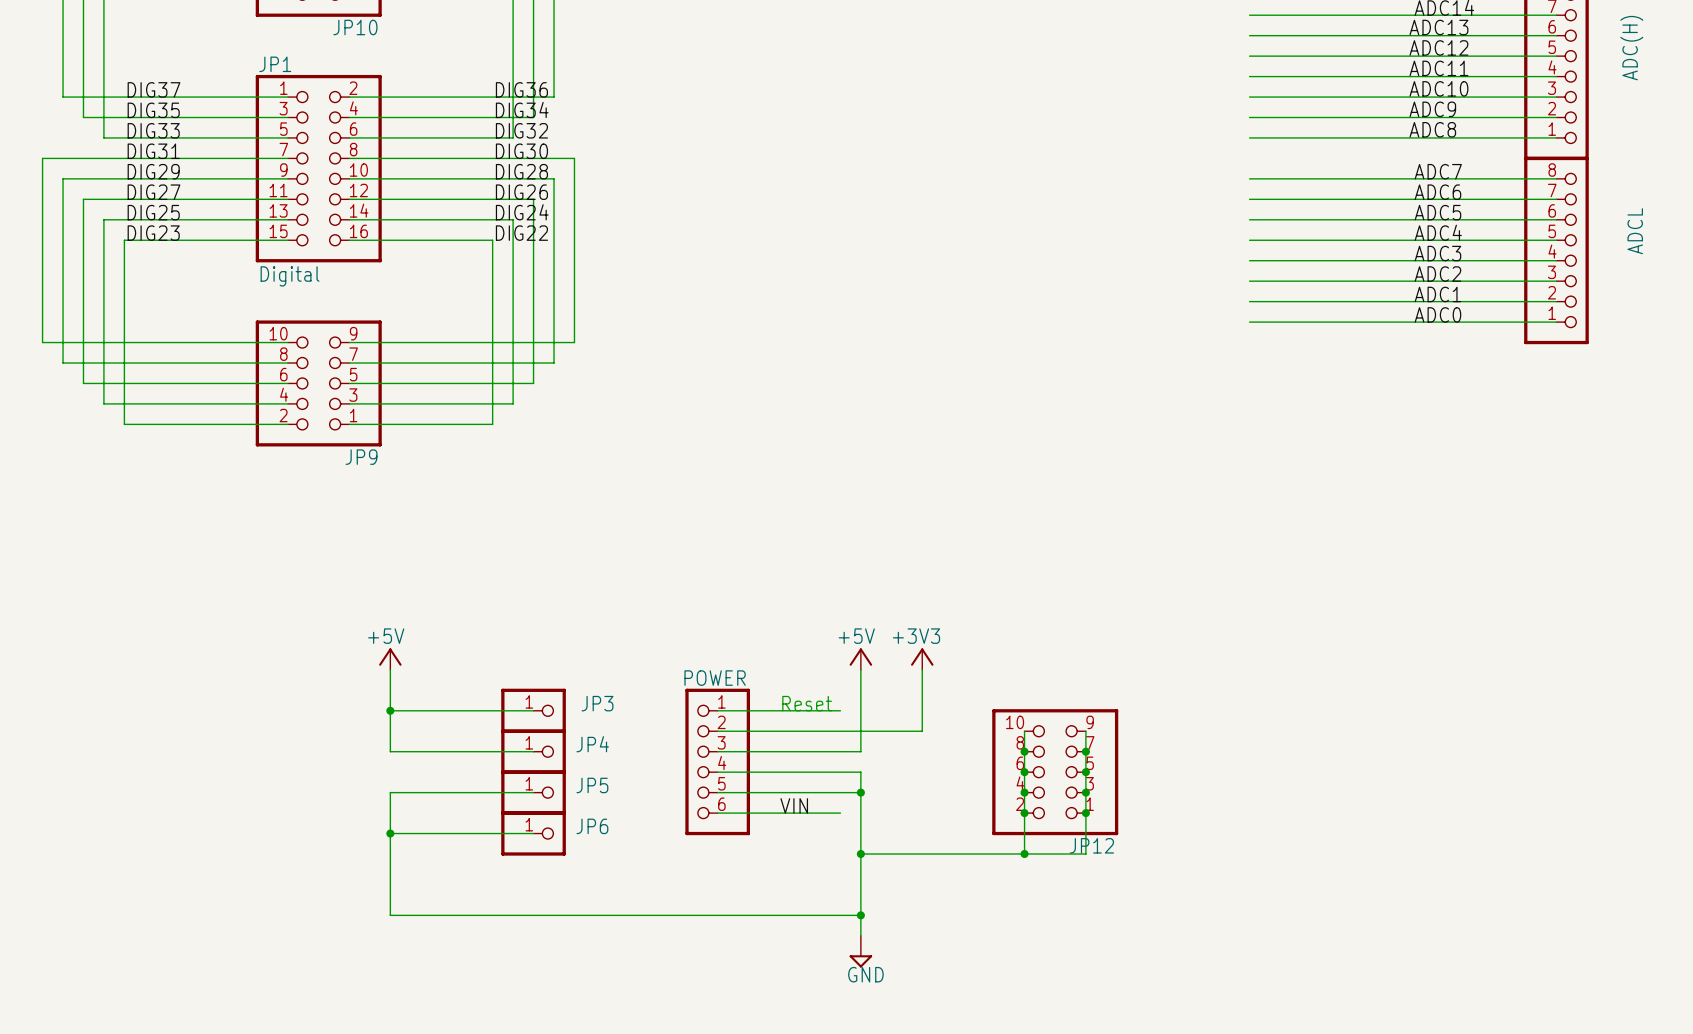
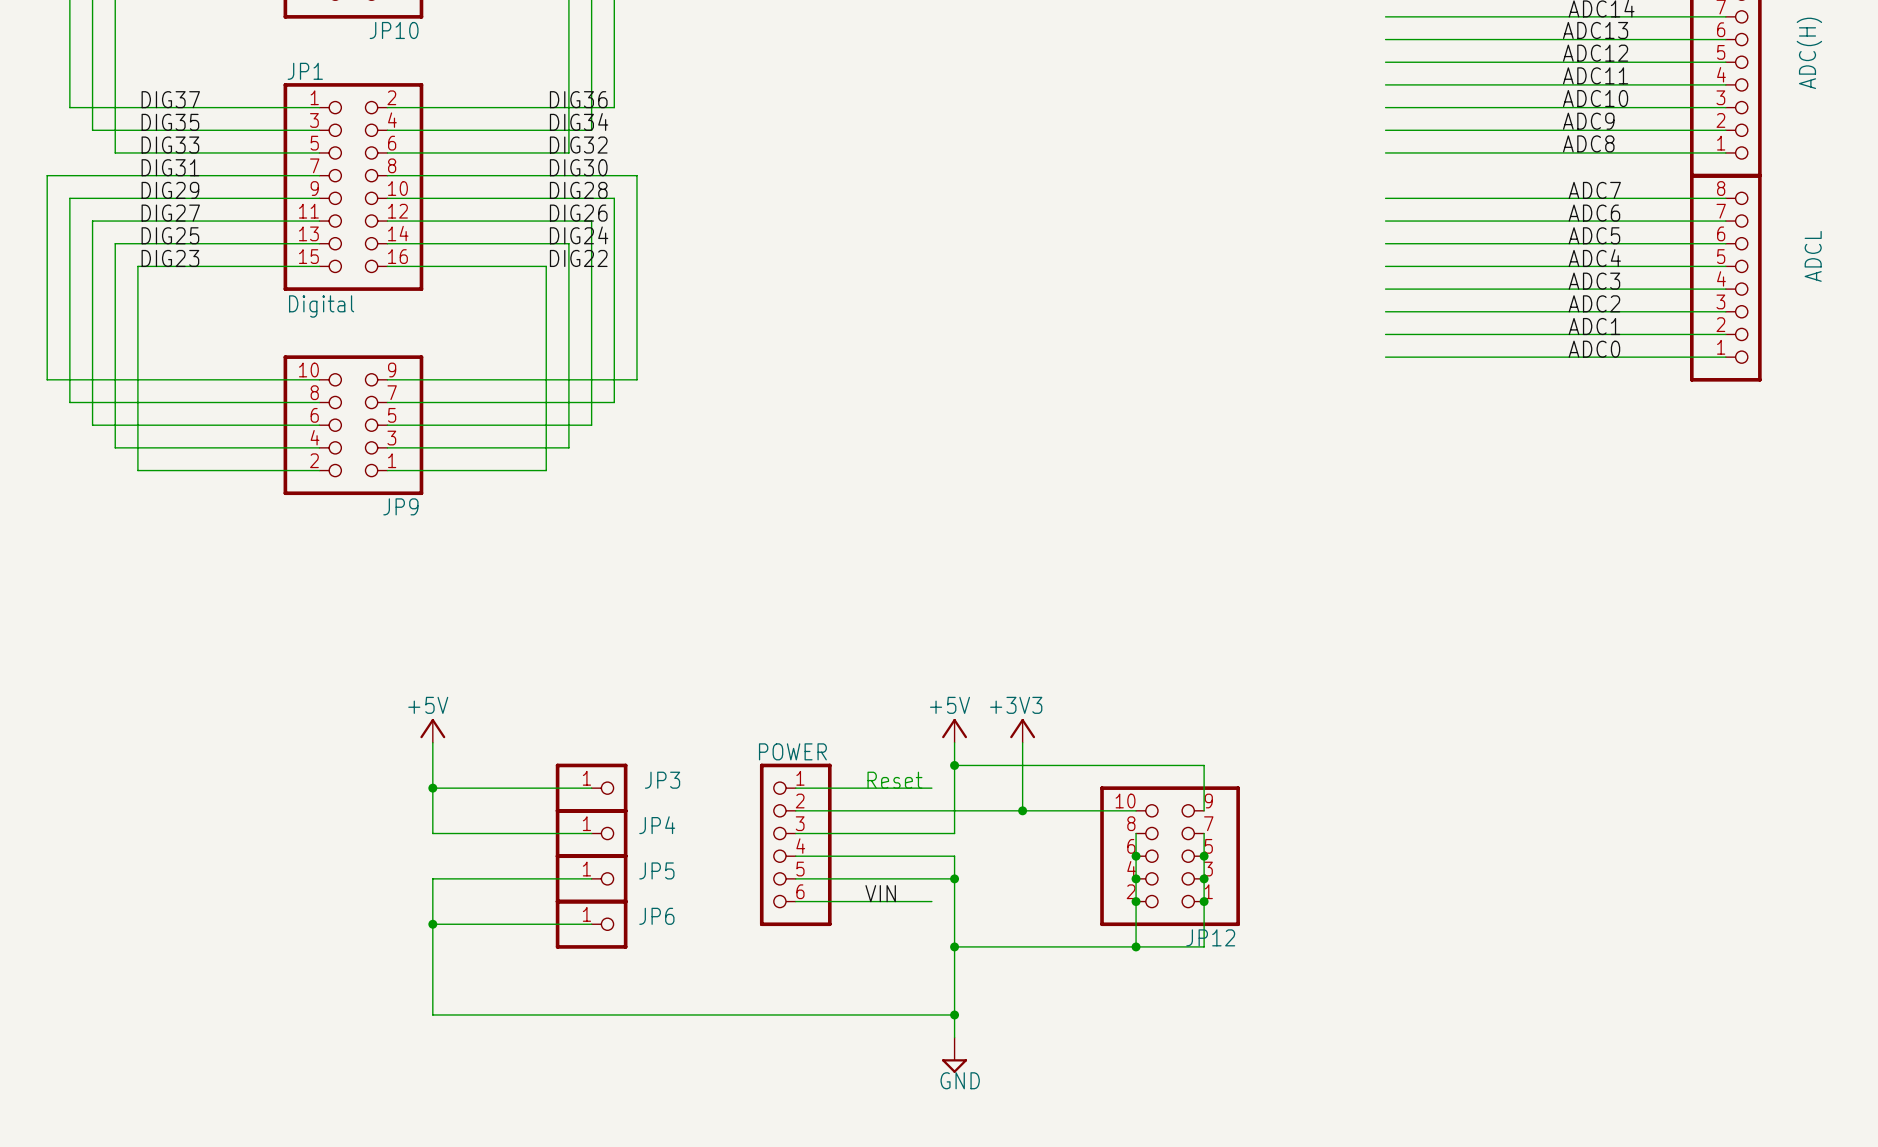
junction: none -> (954, 765)
junction: none -> (1022, 810)
wire: (1024, 731) (1024, 751) -> (1136, 810) (1022, 810)
wire: (1085, 731) (1085, 751) -> (1204, 810) (1204, 765) (954, 765)
junction: (1024, 751) -> none
junction: (1085, 751) -> none

